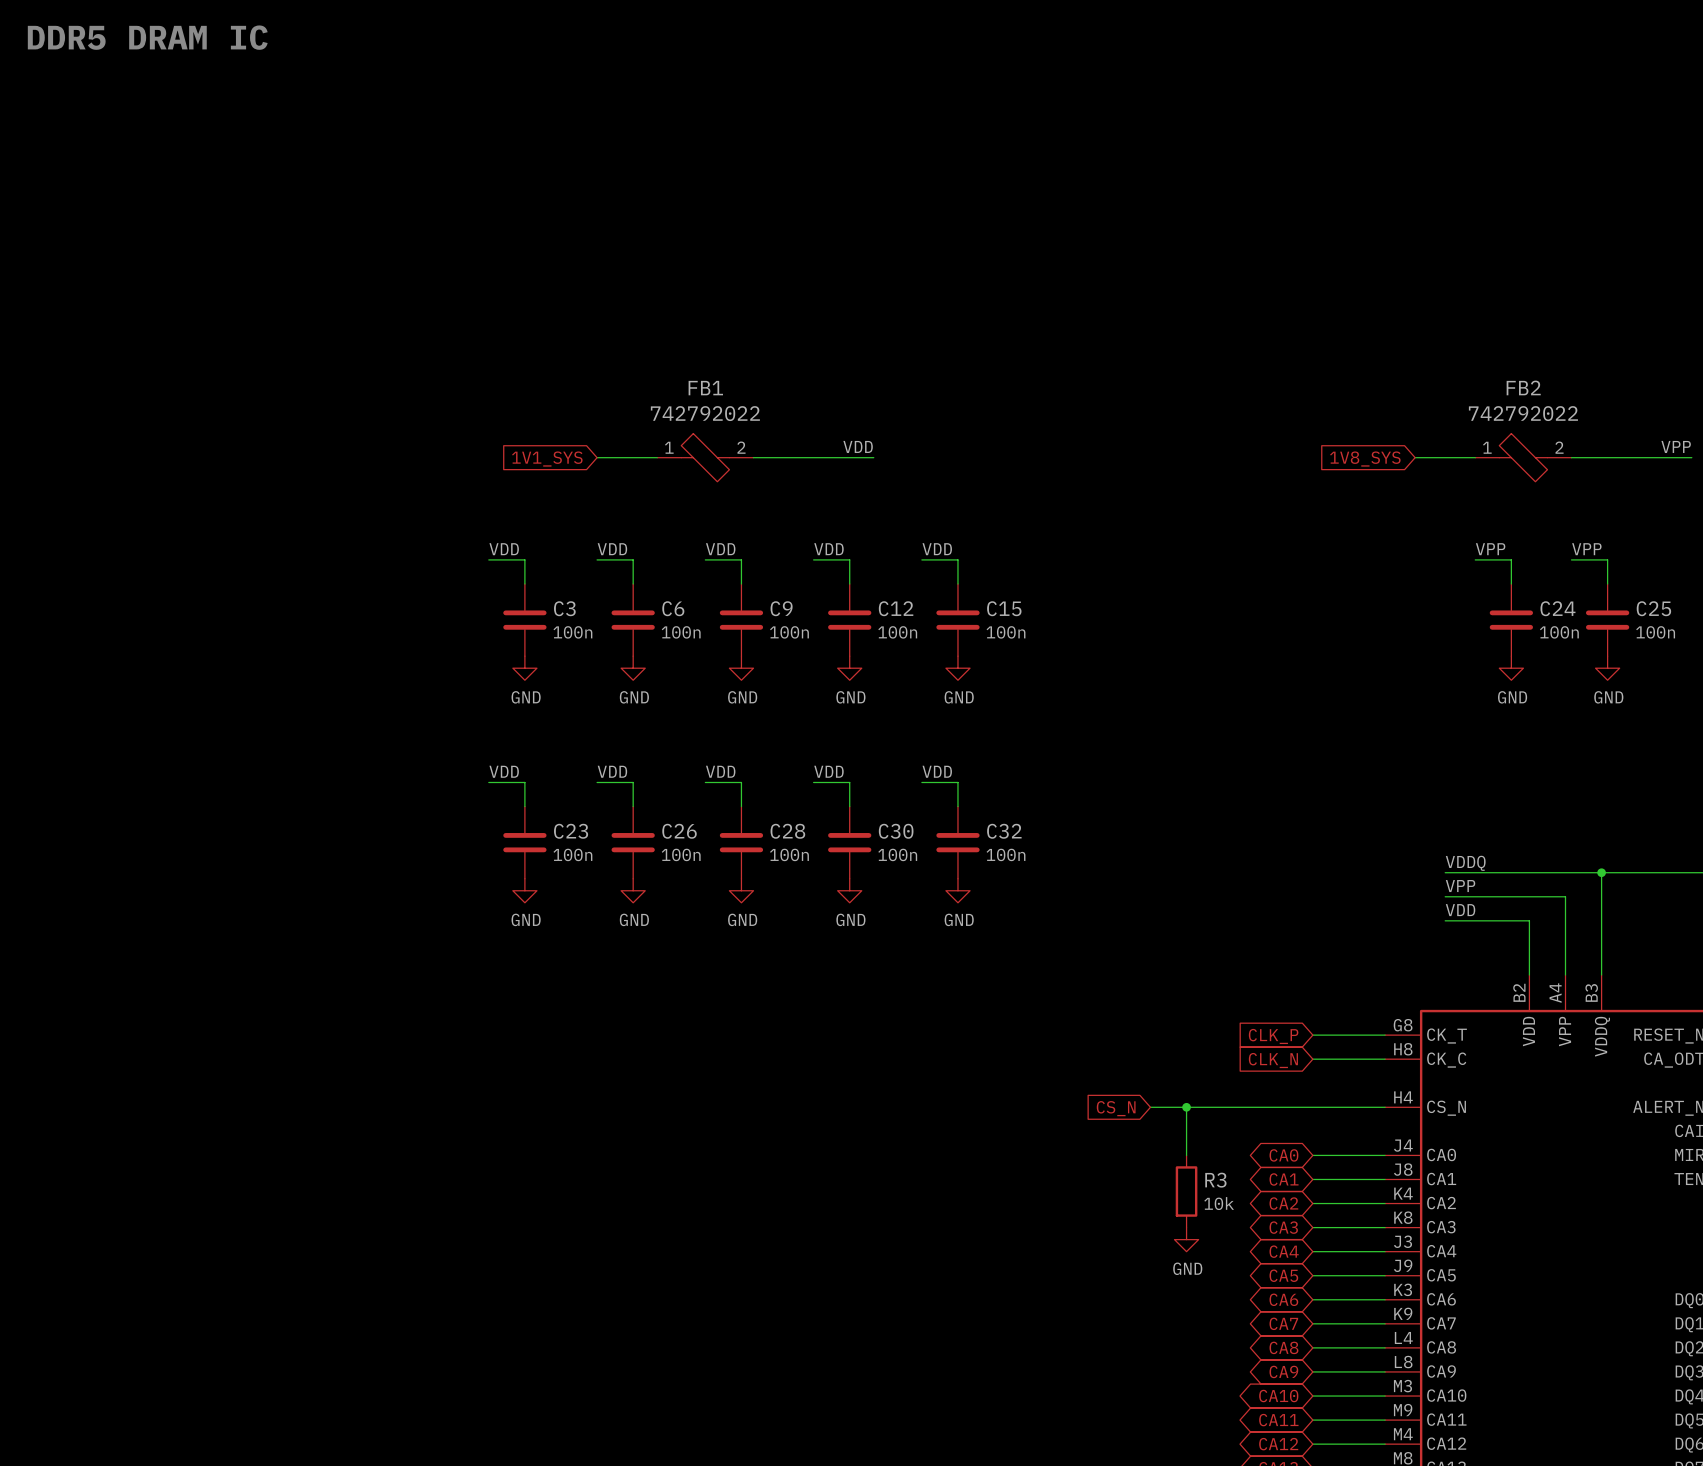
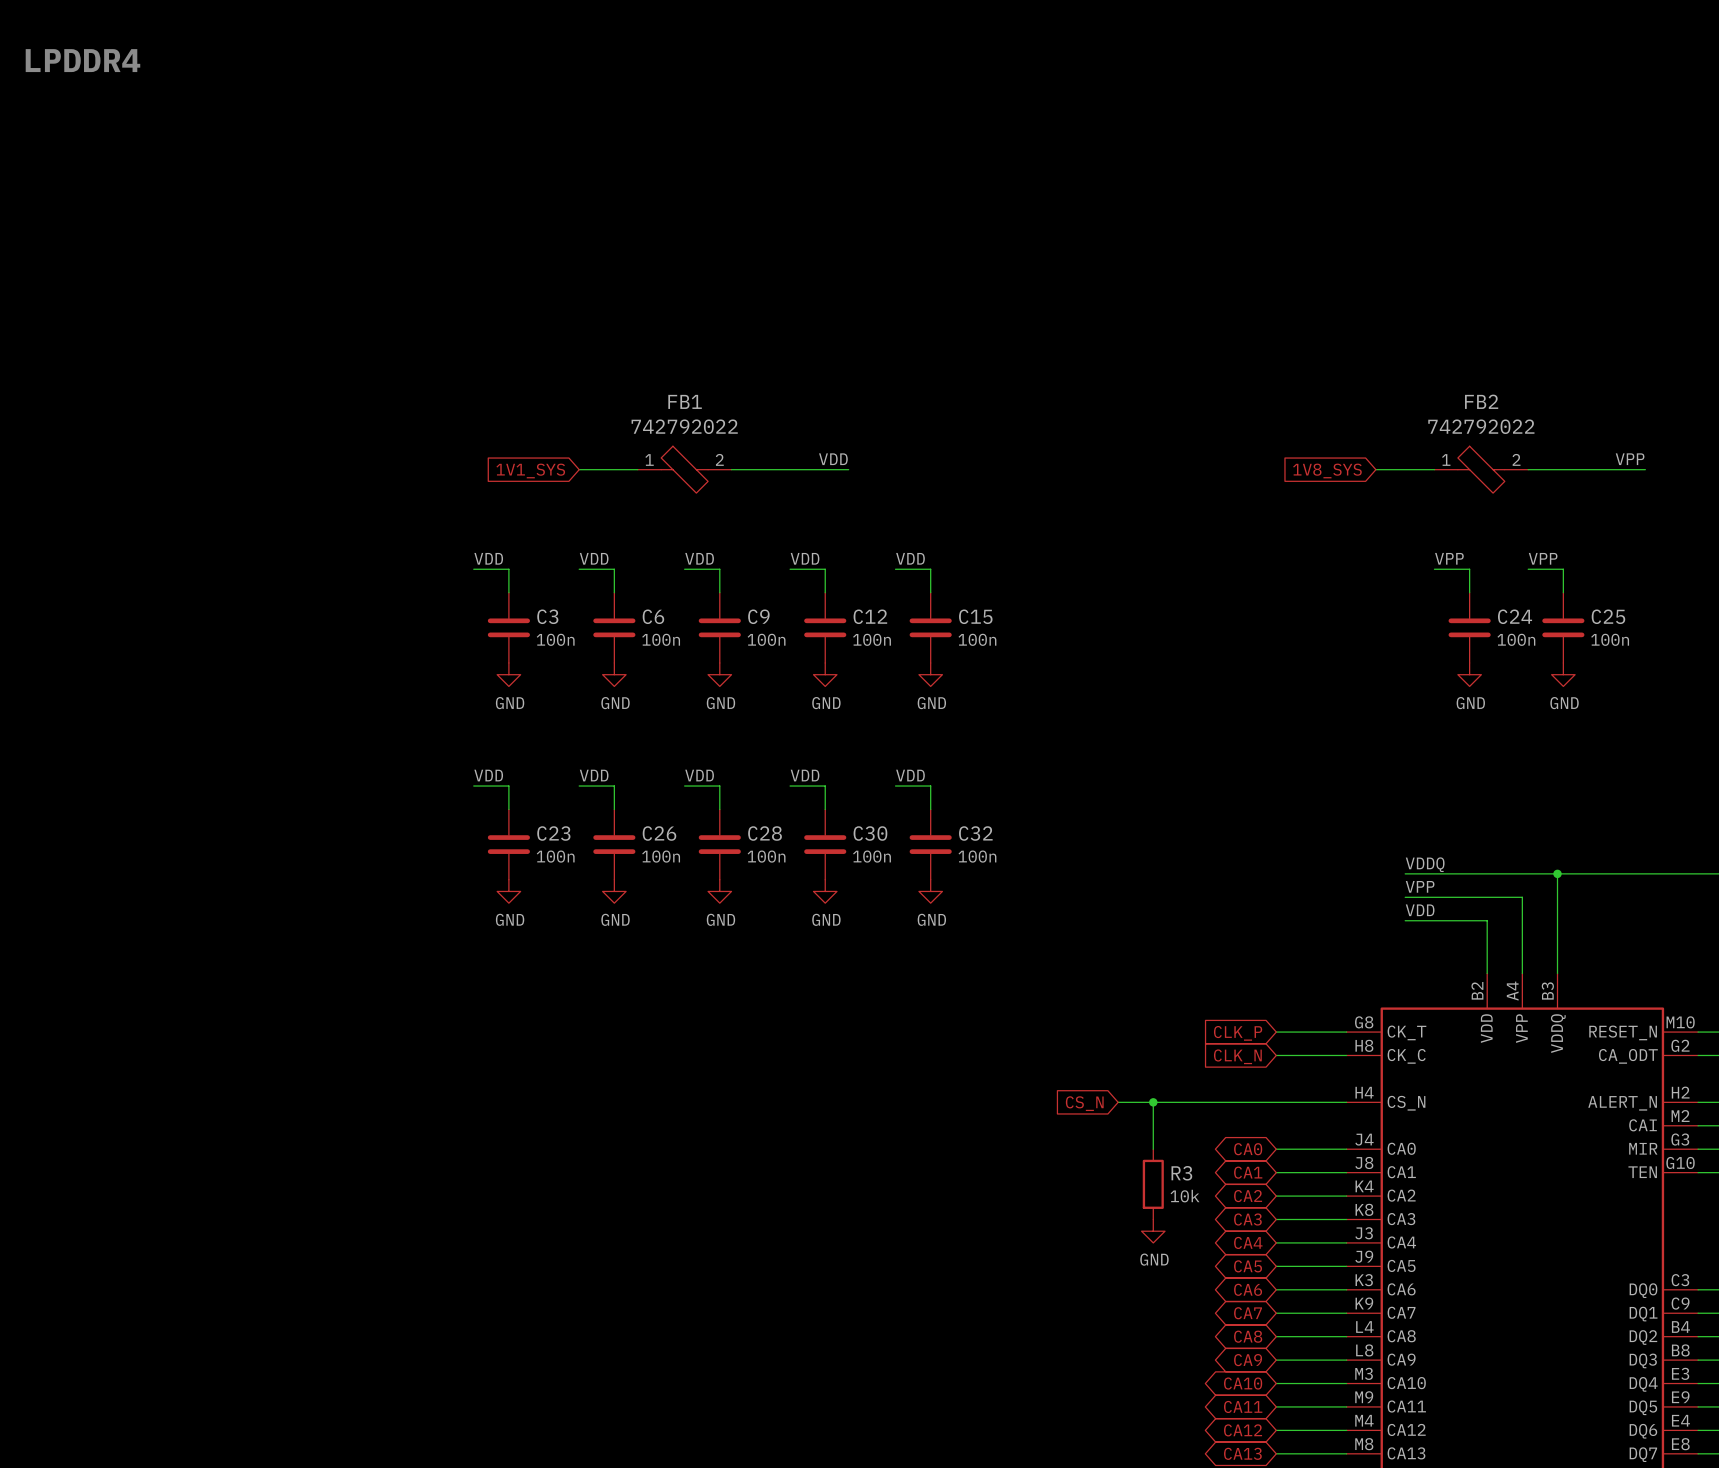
text: DDR5 DRAM IC (147, 37) -> LPDDR4 (82, 60)

